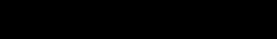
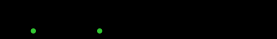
junction: none -> (33, 30)
junction: none -> (99, 30)

